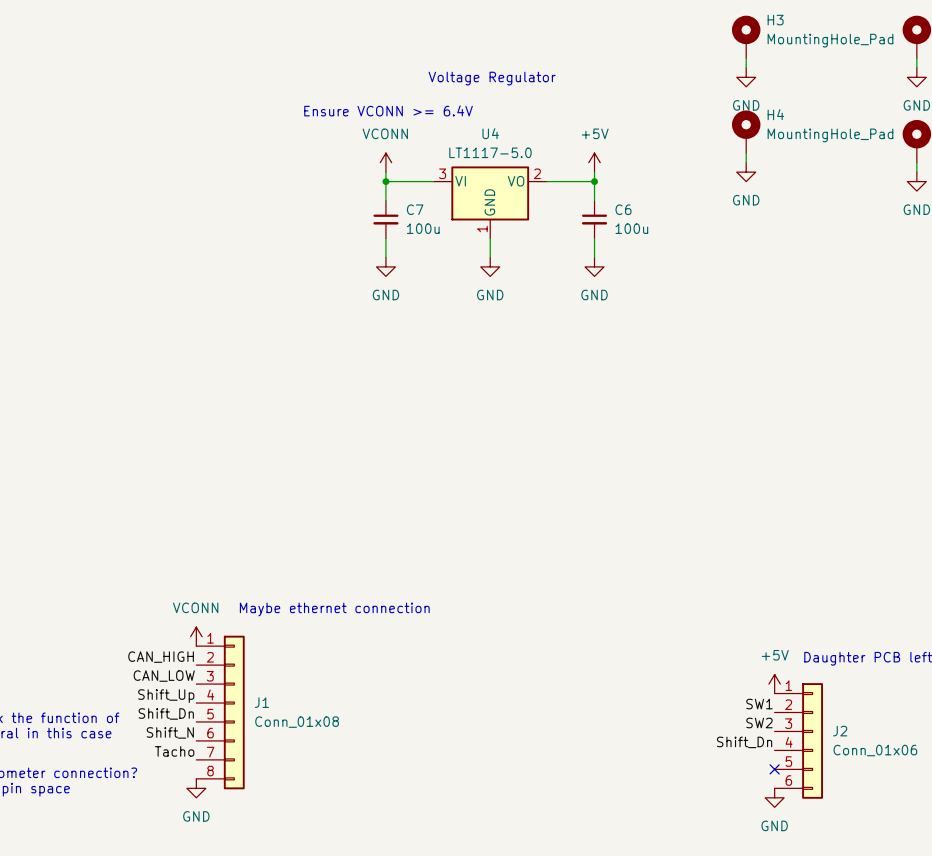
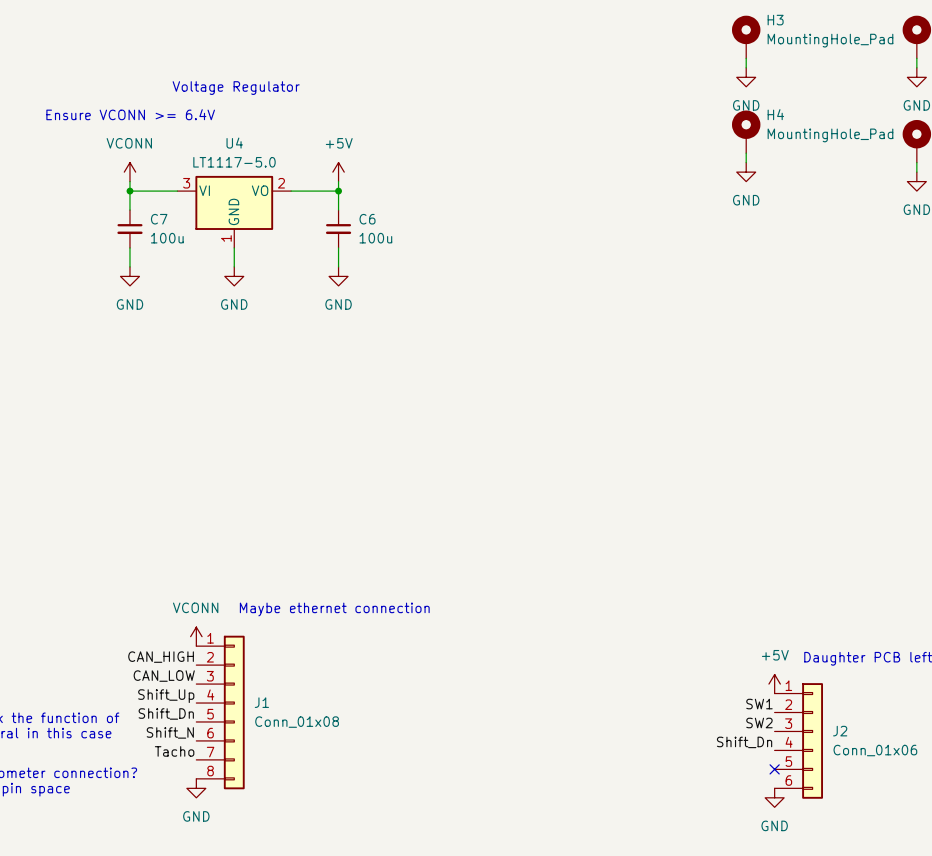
text: Voltage Regulator (492, 78) -> none
text: none -> Voltage Regulator (236, 88)
text: Ensure VCONN >= 6.4V (388, 110) -> none
text: none -> Ensure VCONN >= 6.4V (130, 114)
power symbol: VCONN (385, 162) -> none
power symbol: +5V (594, 162) -> none
power symbol: none -> VCONN (129, 172)
power symbol: none -> +5V (338, 172)
wire: (385, 172) (385, 200) -> (338, 181) (338, 210)
wire: (594, 172) (594, 200) -> none
wire: none -> (129, 181) (129, 210)
wire: (385, 181) (433, 181) -> (291, 191) (338, 191)
junction: (385, 181) -> none
wire: (547, 181) (594, 181) -> none
junction: (594, 181) -> none
wire: none -> (129, 191) (177, 191)
junction: none -> (129, 191)
junction: none -> (338, 191)
U4 position: (490, 202) -> (234, 211)
C7 position: (385, 219) -> (129, 229)
C6 position: (594, 219) -> (338, 229)
wire: (385, 238) (385, 257) -> (338, 247) (338, 266)
wire: (490, 238) (490, 257) -> none
wire: (594, 238) (594, 257) -> none
wire: none -> (129, 247) (129, 266)
wire: none -> (234, 247) (234, 266)
power symbol position: GND (385, 266) -> GND (338, 276)
power symbol: GND (490, 266) -> none
power symbol: GND (594, 266) -> none
power symbol: none -> GND (129, 276)
power symbol: none -> GND (234, 276)

